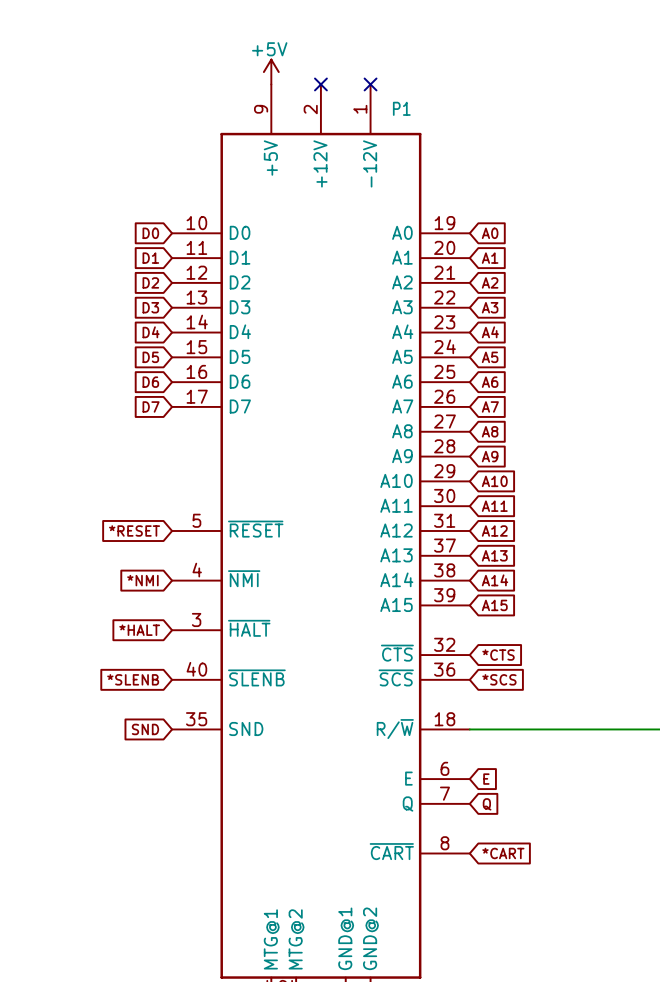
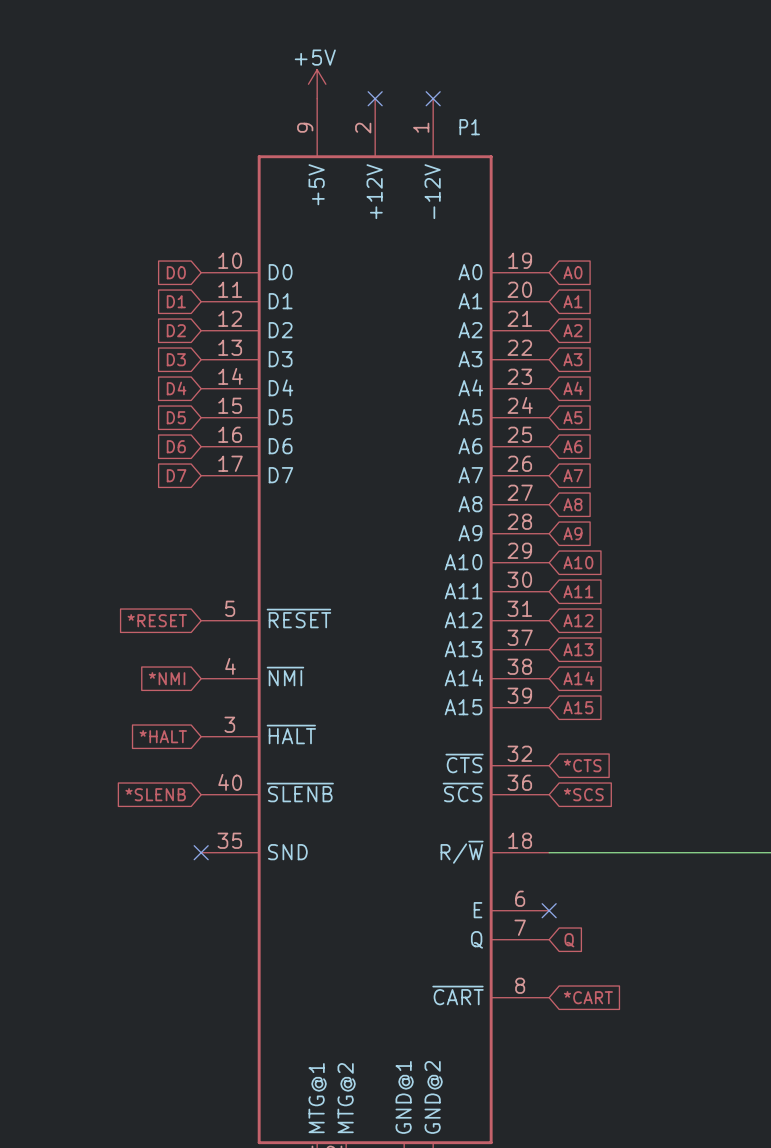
global label: SND (145, 729) -> none
no-connect mark: none -> (201, 852)
no-connect mark: none -> (549, 910)
global label: E (486, 779) -> none

